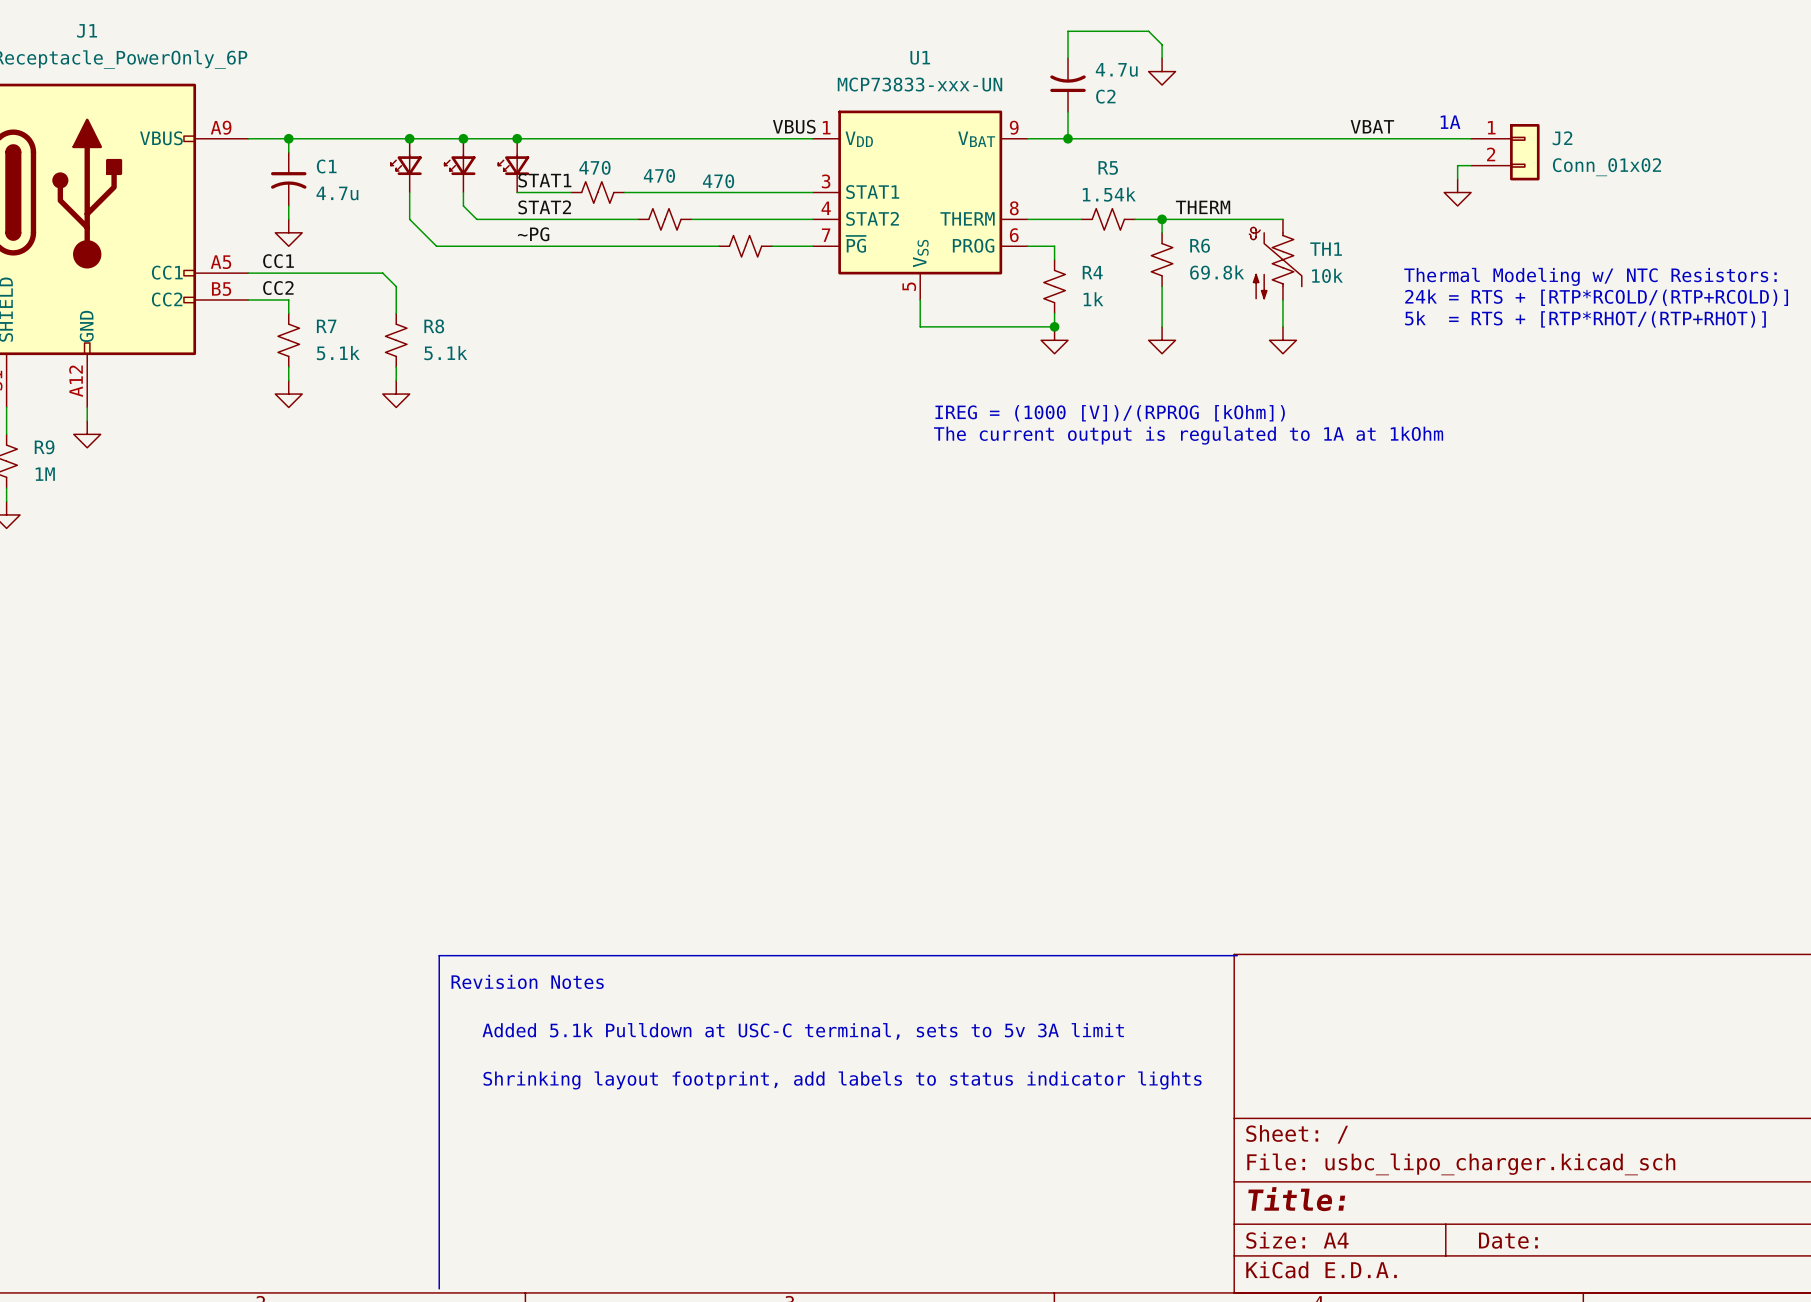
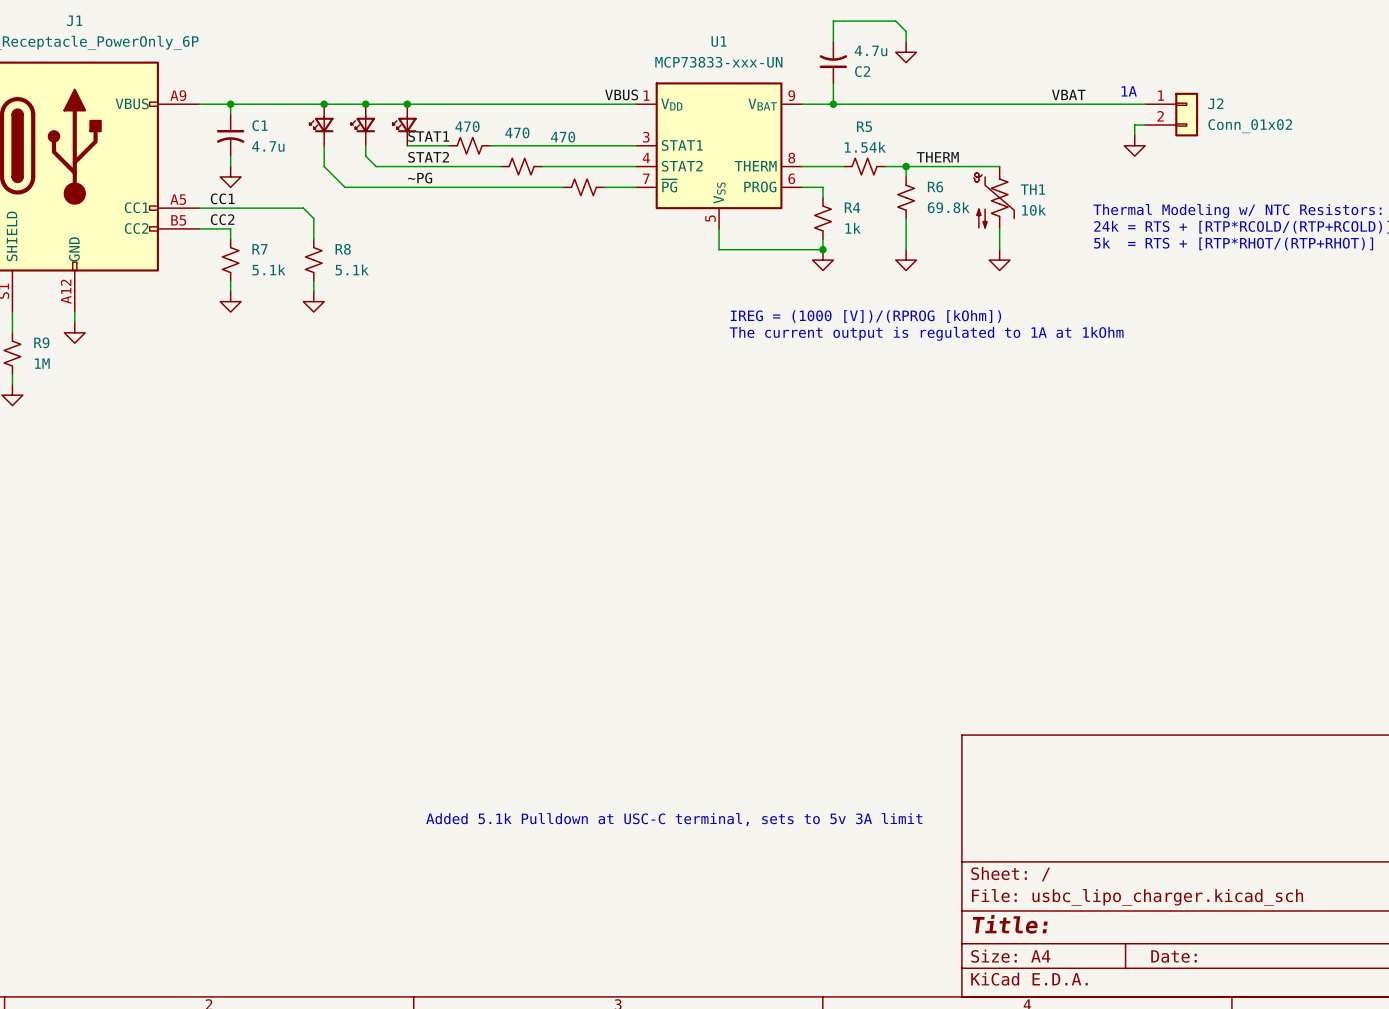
line: (1237, 955) (439, 955) (439, 1288) -> none
text: Revision Notes (527, 981) -> none
text position: Added 5.1k Pulldown at USC-C terminal, sets to 5v 3A limit (803, 1031) -> Added 5.1k Pulldown at USC-C terminal, sets to 5v 3A limit (674, 819)
text: Shrinking layout footprint, add labels to status indicator lights (842, 1080) -> none

